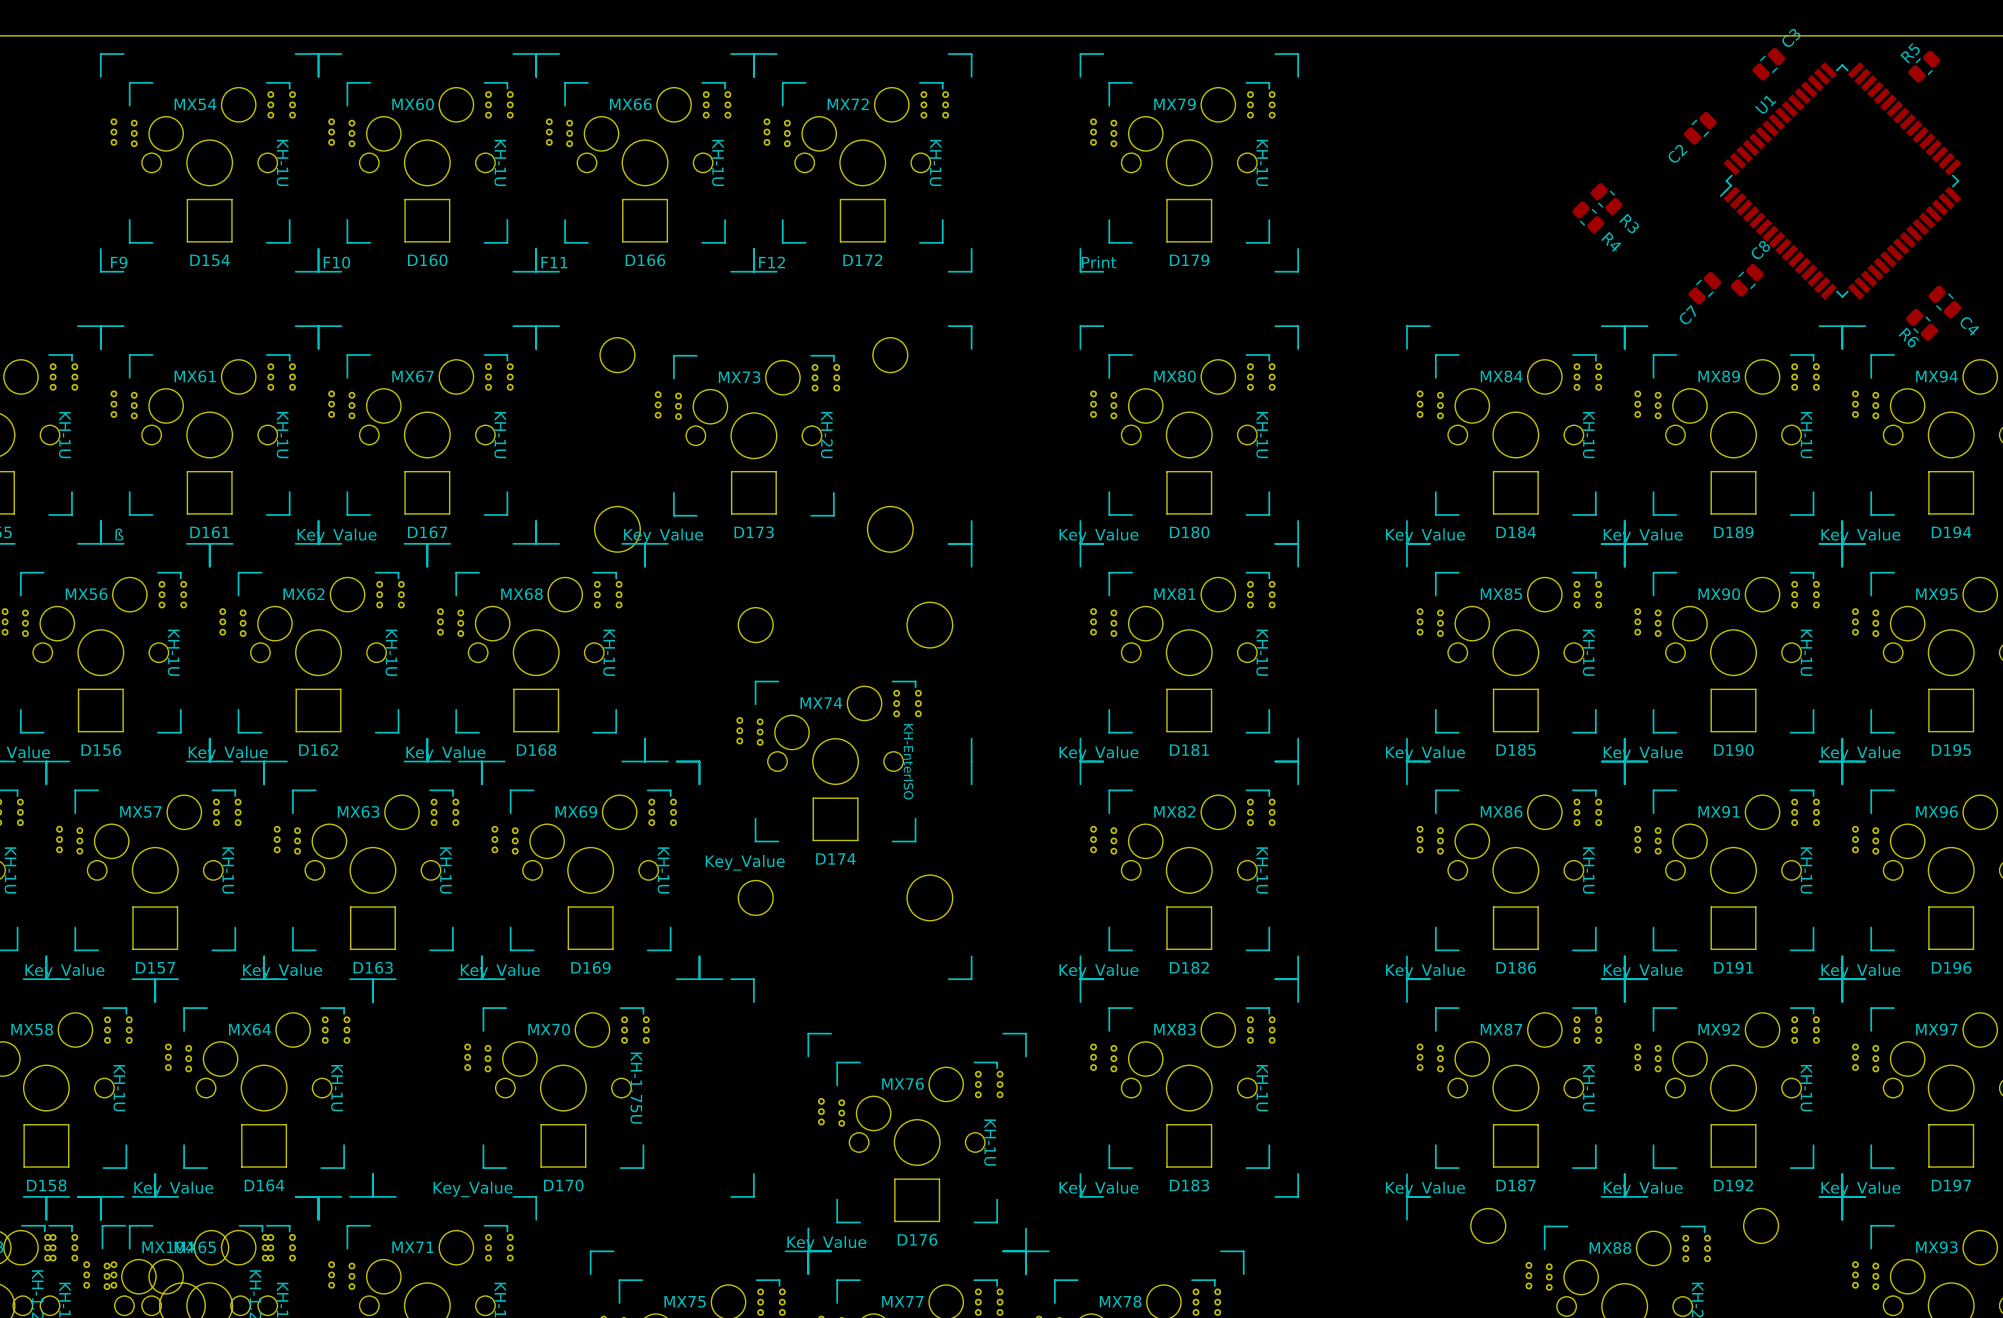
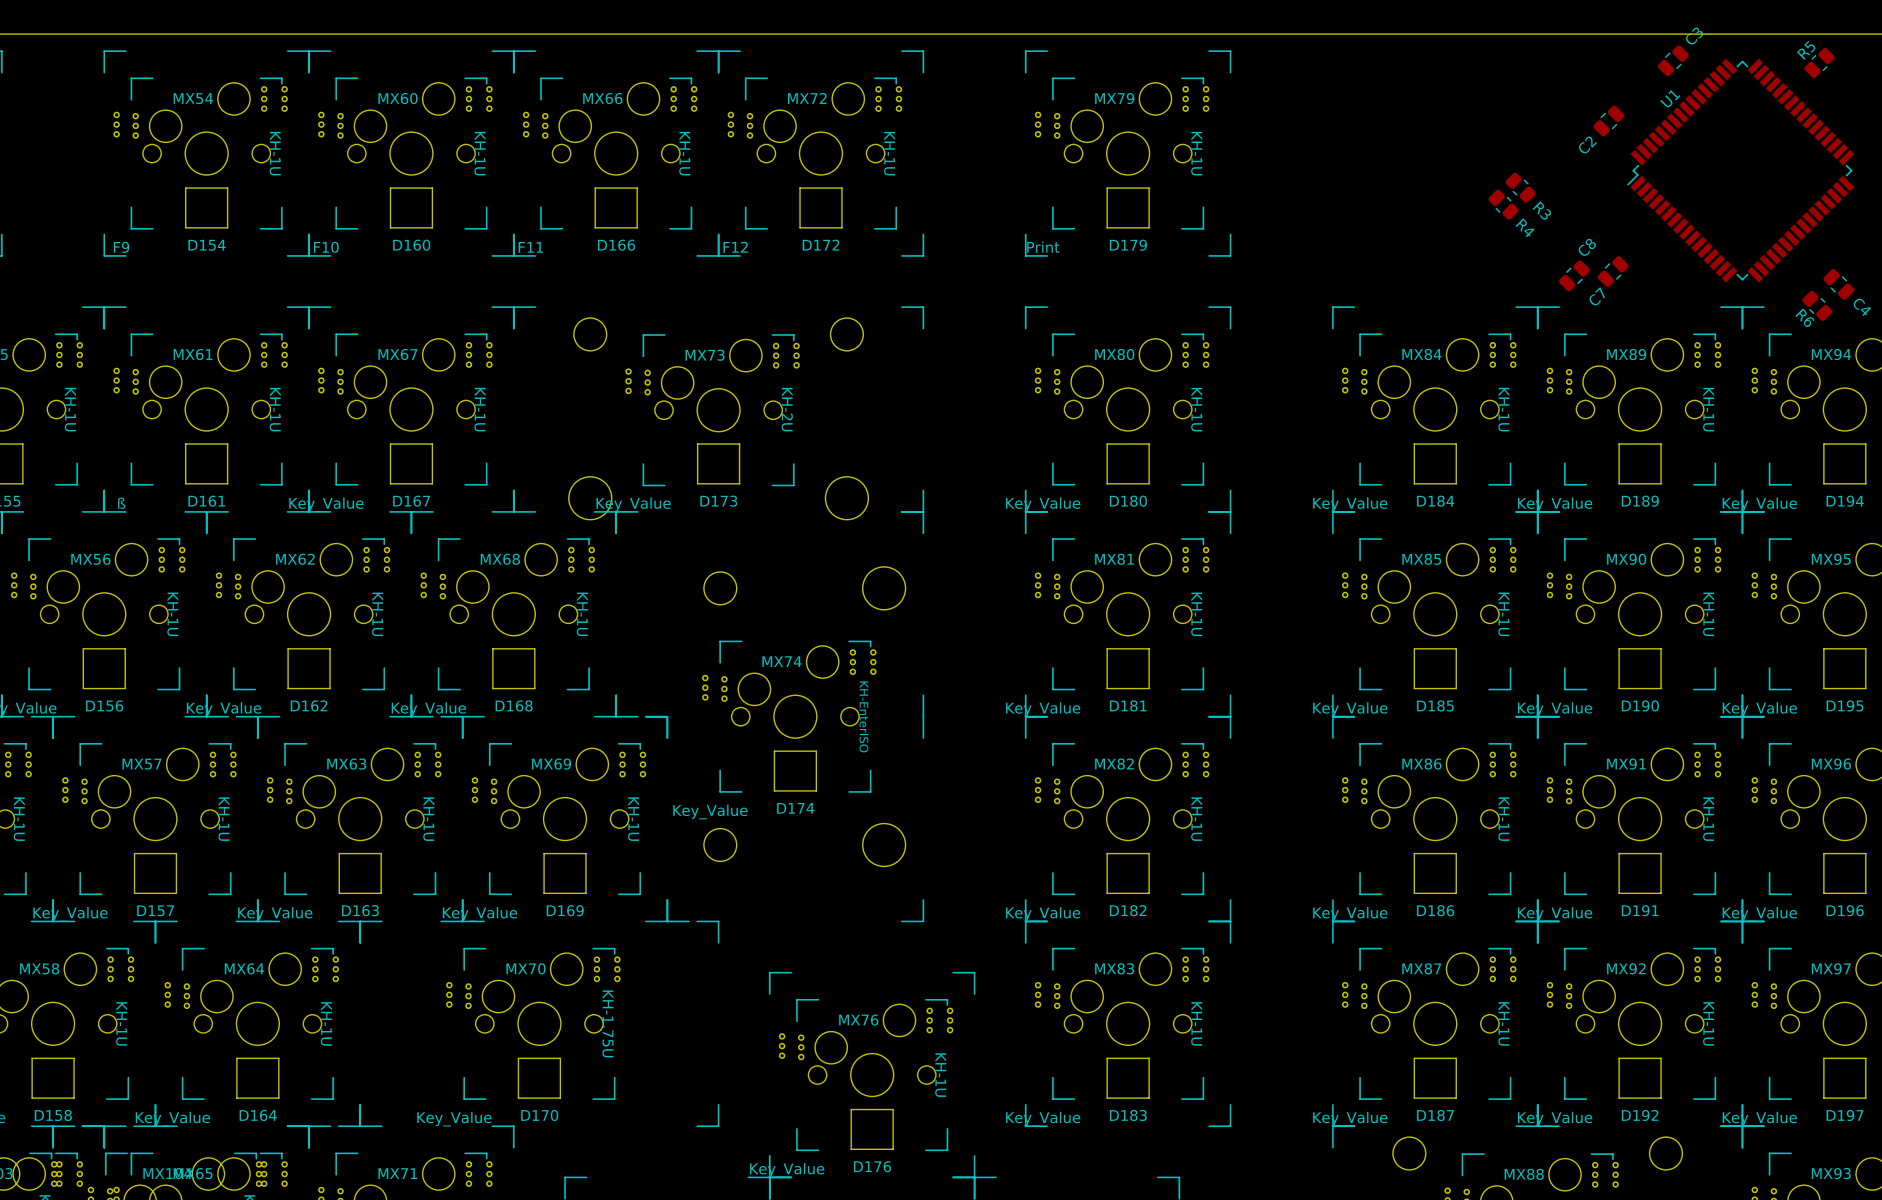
C8 position: (1747, 280) -> (1574, 275)

